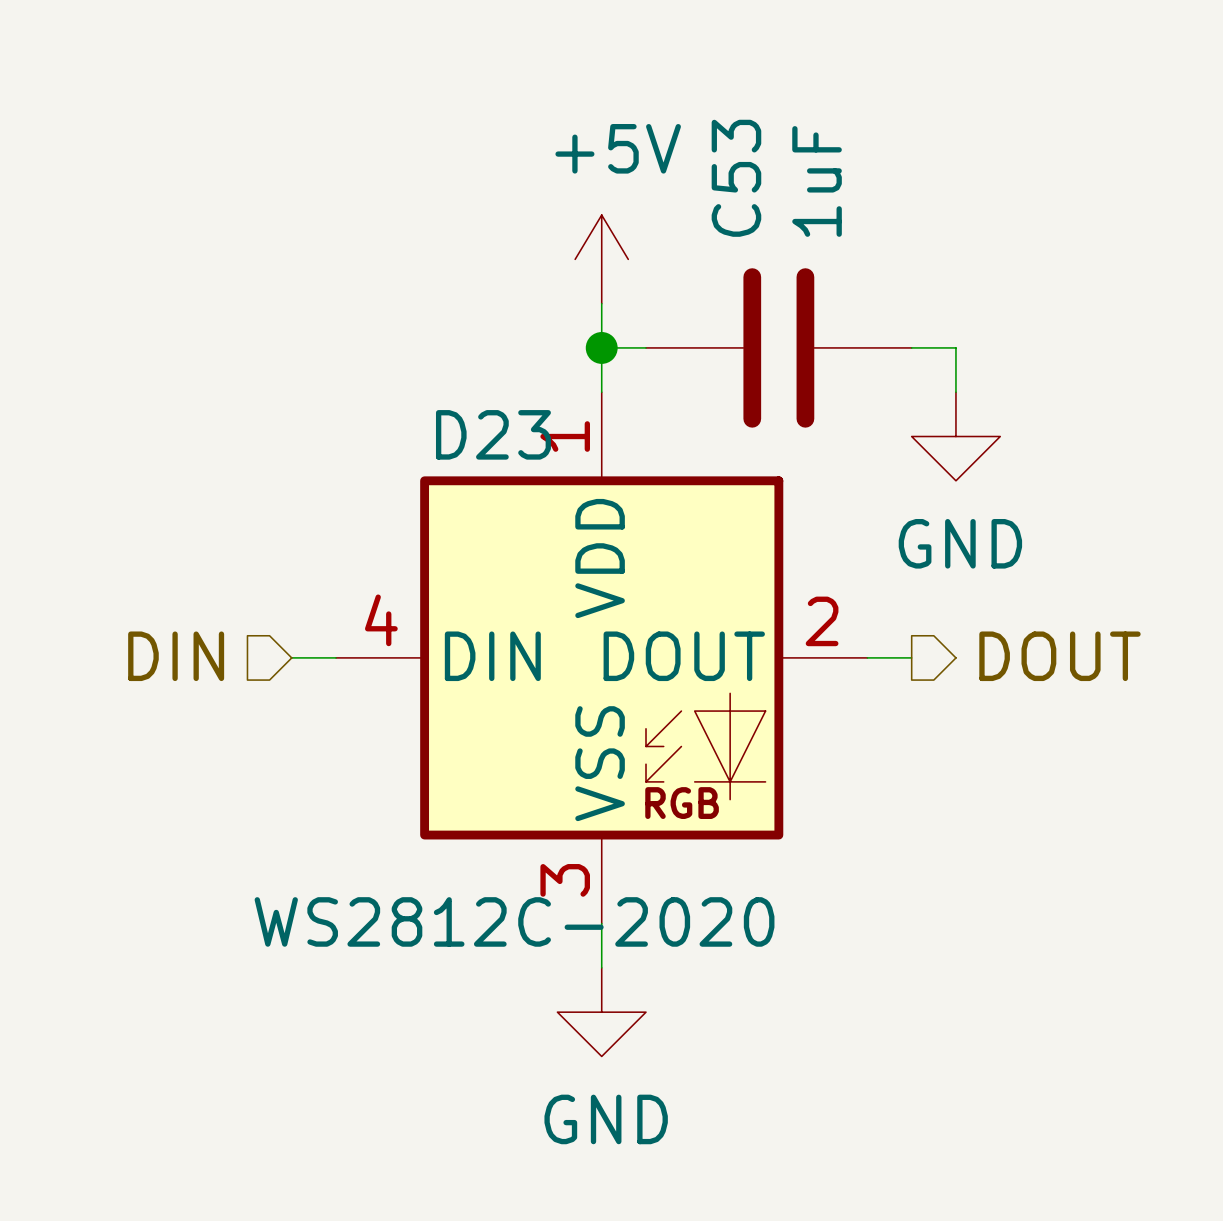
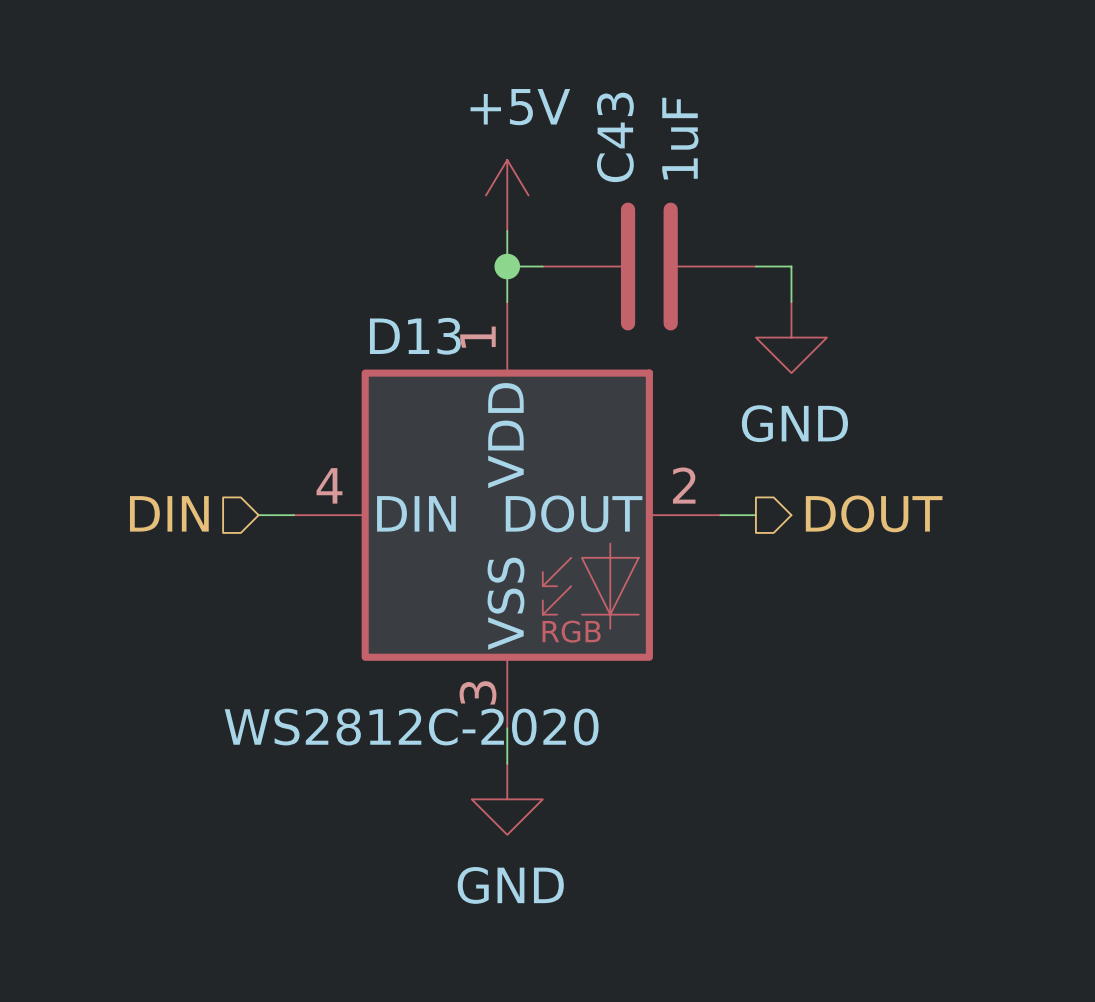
C53 name: C53 (736, 178) -> C43 (615, 137)
D23 name: D23 (493, 434) -> D13 (415, 336)

